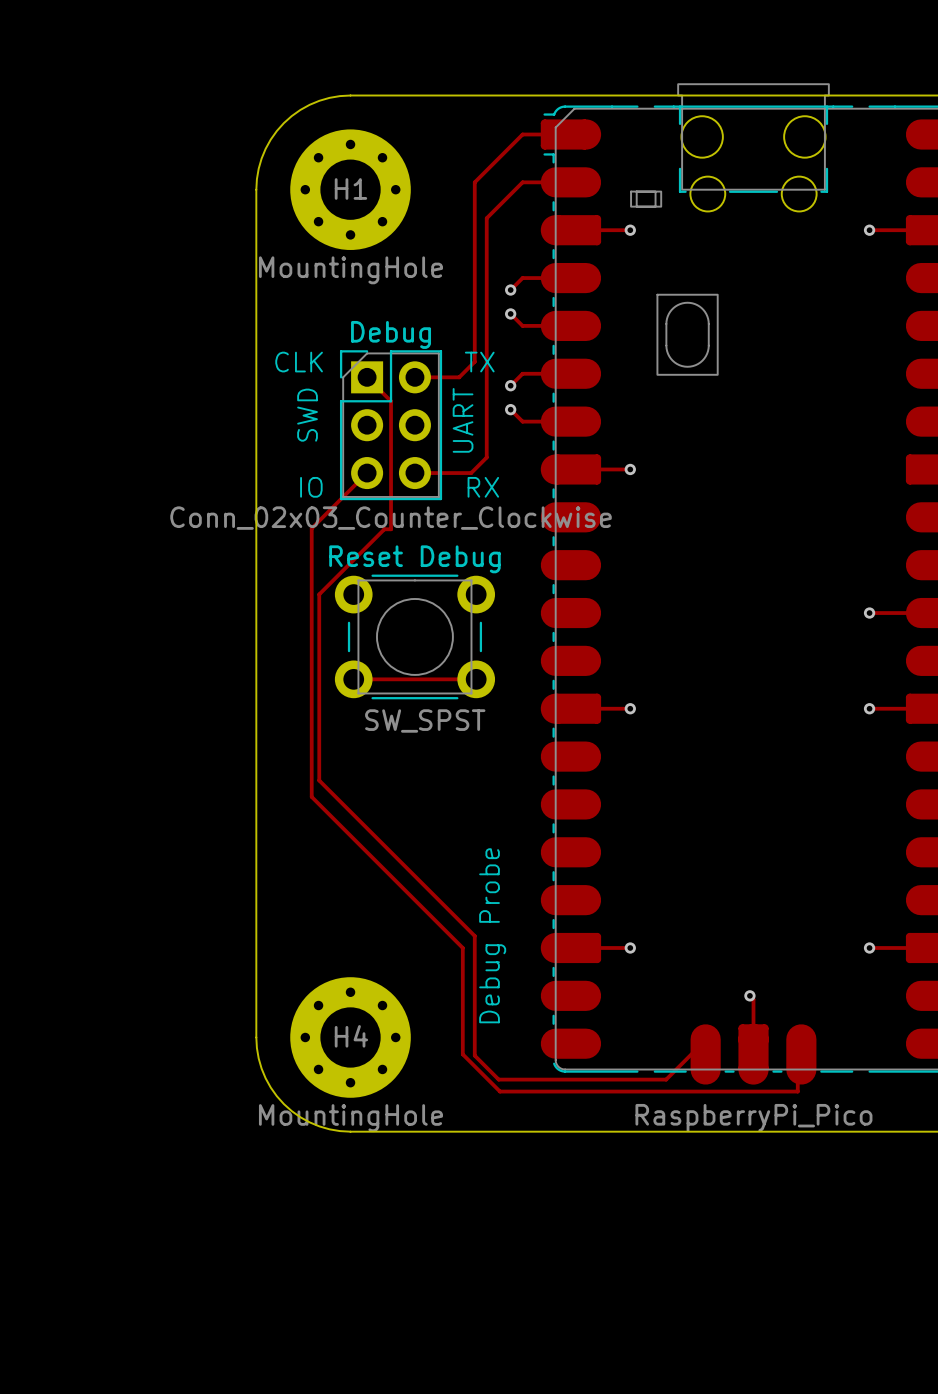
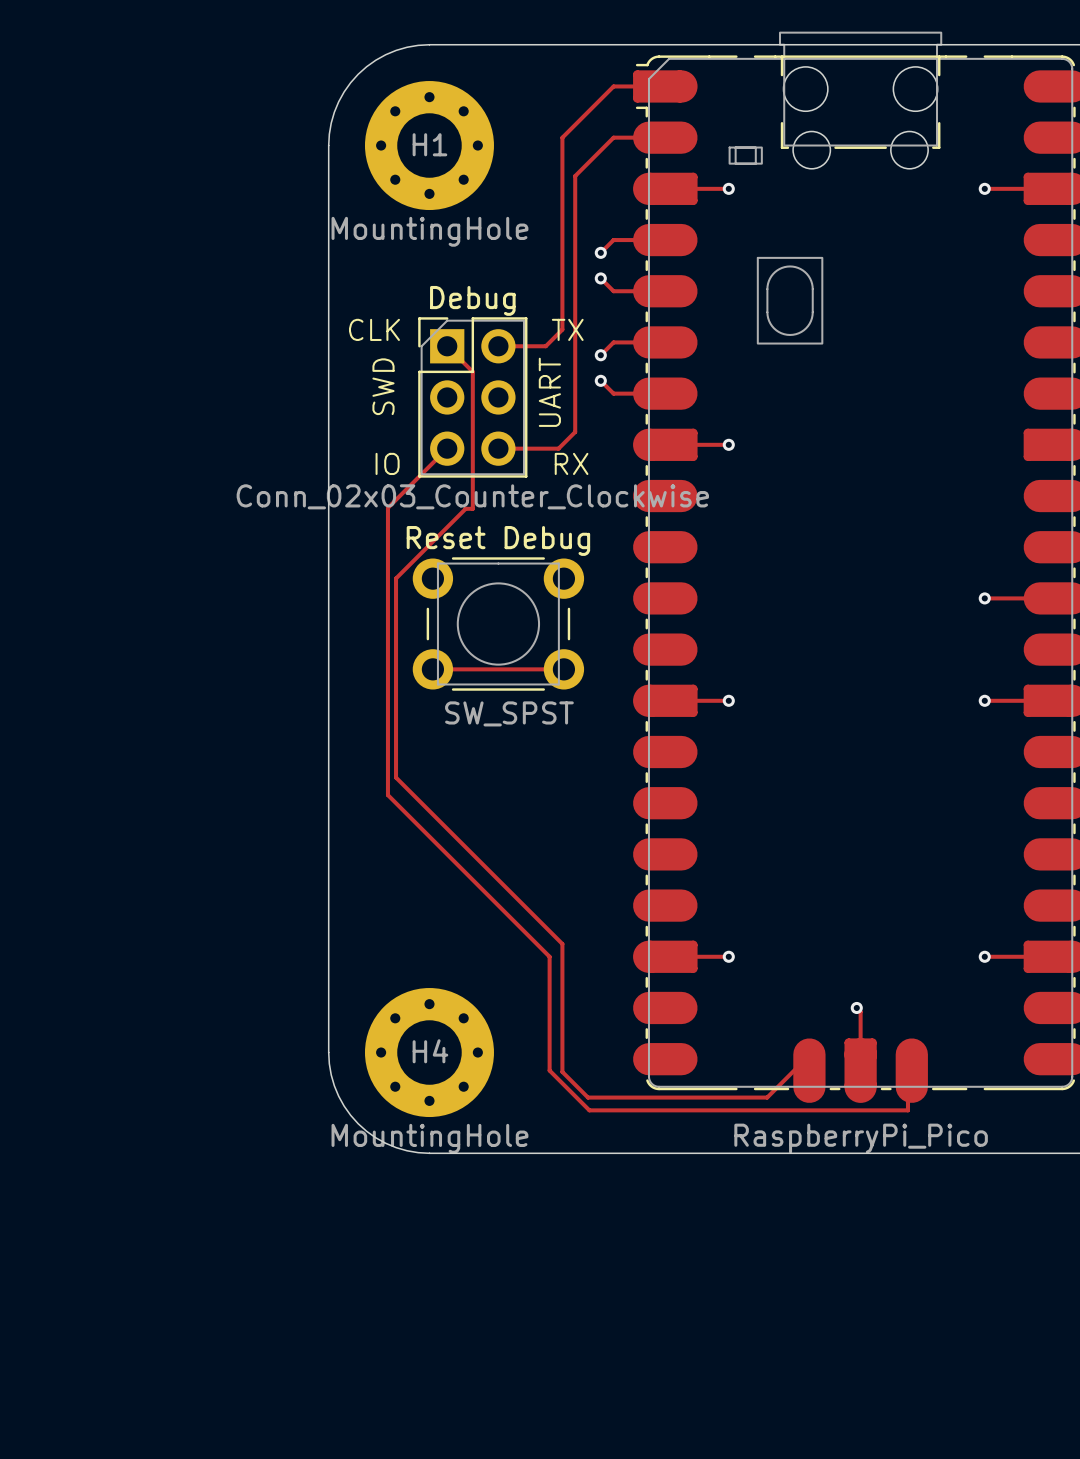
text: Debug Probe (492, 935) -> none

